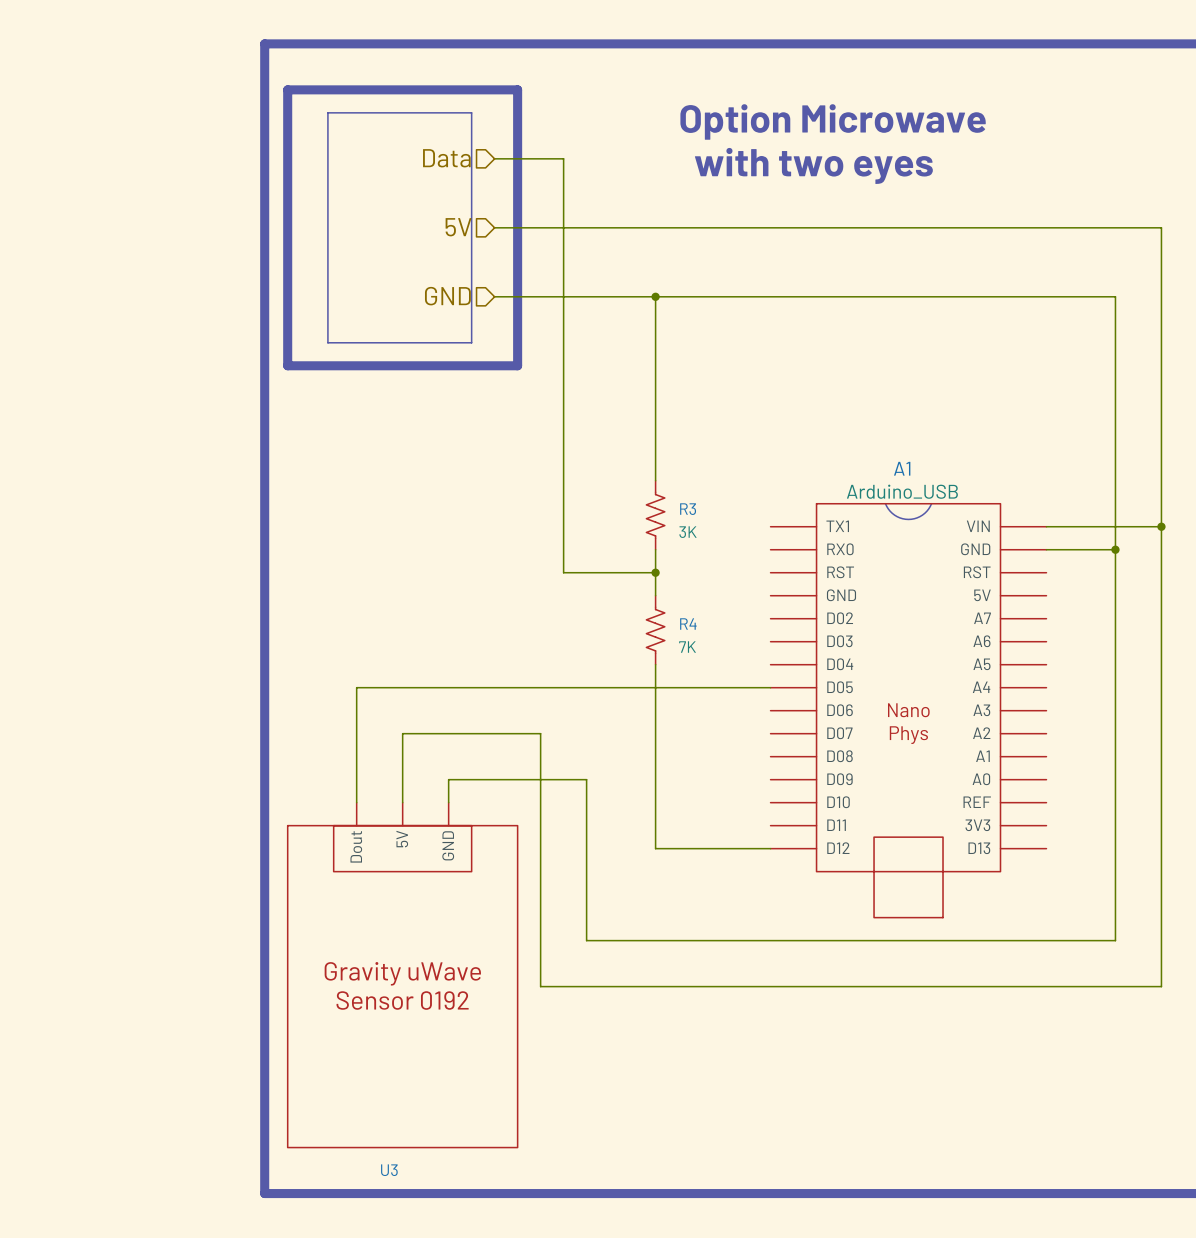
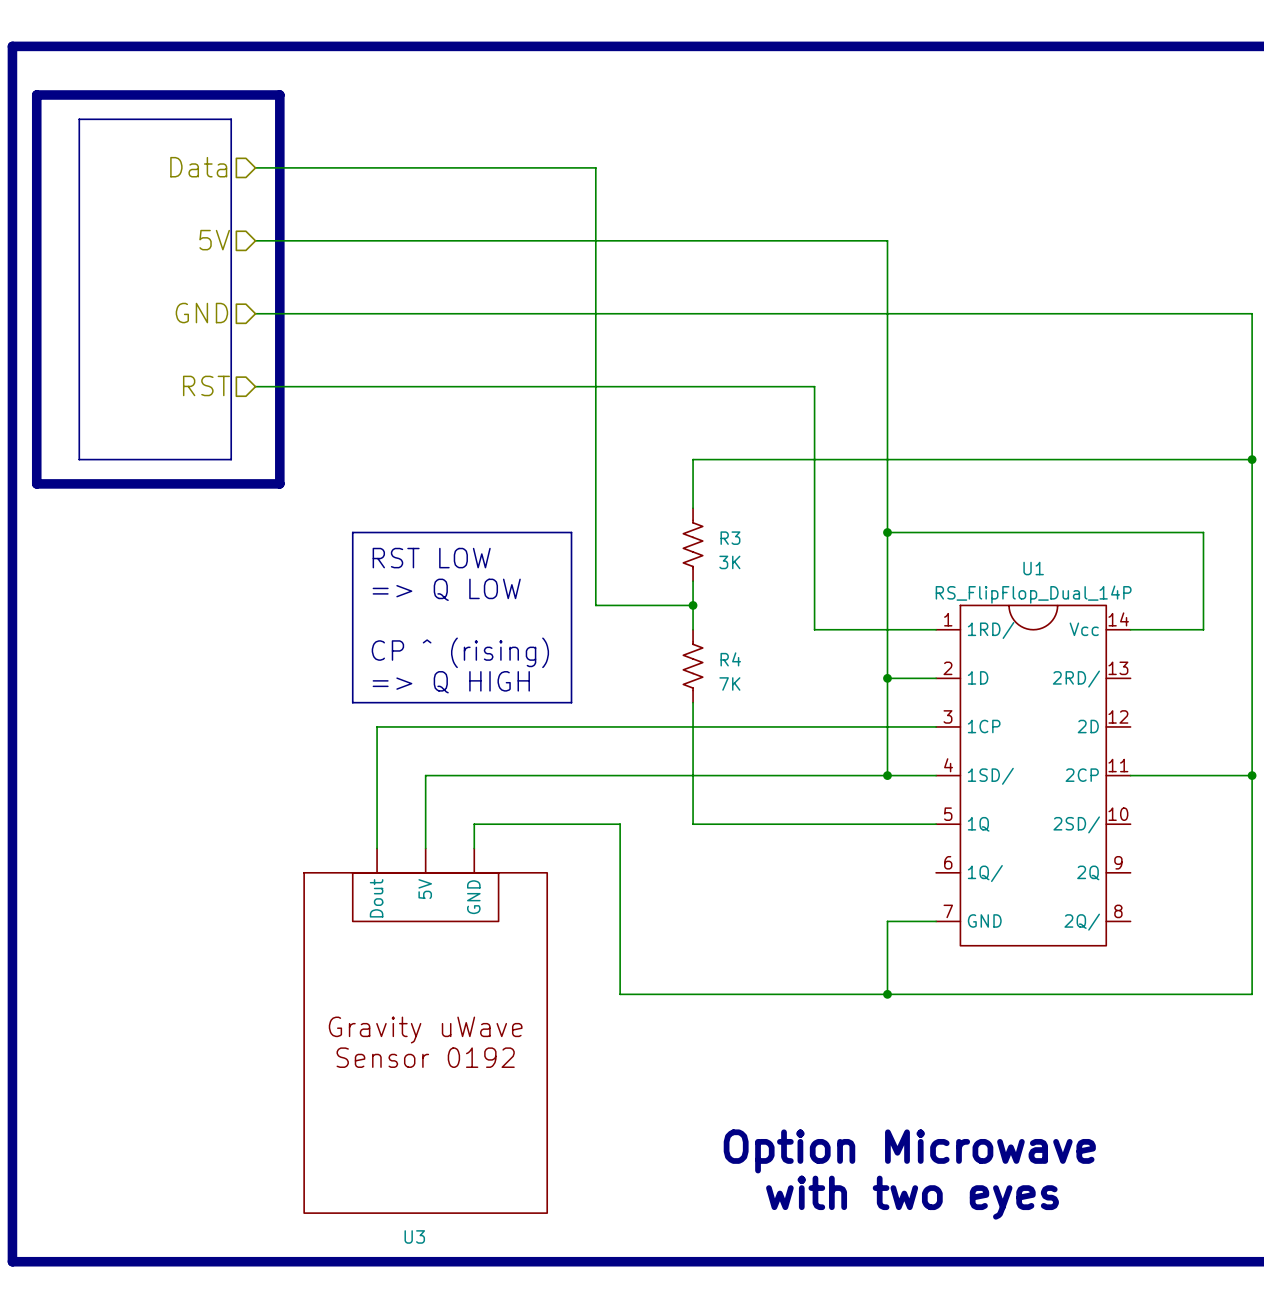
line: (264, 43) (264, 89) -> (279, 483) (36, 483) (36, 94) (279, 94)
line: (287, 89) (517, 89) (517, 365) (287, 365) (287, 89) -> none
line: none -> (79, 119) (231, 119) (231, 459) (79, 459) (79, 119)
line: (327, 112) (471, 112) (471, 342) (327, 342) (327, 112) -> none
text: Option Microwave (833, 121) -> none
hierarchical label: none -> Data (198, 167)
wire: none -> (255, 167) (522, 167)
hierarchical label: Data (446, 158) -> none
text: with two eyes (813, 165) -> none
hierarchical label: none -> 5V (214, 240)
wire: none -> (255, 240) (522, 240)
hierarchical label: 5V (458, 227) -> none
wire: (839, 227) (1161, 227) (1161, 986) (540, 986) (540, 733) -> (887, 240) (887, 775)
hierarchical label: none -> GND (201, 313)
wire: none -> (255, 313) (522, 313)
hierarchical label: GND (447, 296) -> none
wire: (655, 296) (655, 434) -> (1252, 459) (693, 459)
junction: (655, 296) -> none
wire: (1115, 296) (1115, 940) -> (1179, 313) (1252, 313) (1252, 994) (1179, 994)
hierarchical label: none -> RST (206, 385)
wire: none -> (255, 386) (814, 386) (814, 629) (936, 629)
junction: none -> (1252, 459)
line: (264, 457) (264, 1193) -> (279, 46) (12, 46) (12, 1261) (279, 1261)
line: none -> (352, 532) (571, 532) (571, 702) (352, 702) (352, 532)
wire: none -> (887, 532) (1203, 532) (1203, 629) (1130, 629)
junction: none -> (887, 532)
line: (885, 503) (894, 515) (908, 519) (922, 515) (931, 503) -> none
wire: (1046, 526) (1161, 526) -> (1130, 775) (1252, 775)
junction: (1161, 526) -> none
text: none -> RST LOW (431, 558)
wire: (1046, 549) (1115, 549) -> none
junction: (1115, 549) -> none
text: none -> => Q LOW (446, 589)
text: none -> CP ^ (rising) (460, 652)
wire: none -> (887, 678) (936, 678)
junction: none -> (887, 678)
text: none -> => Q HIGH (451, 682)
wire: none -> (814, 726) (936, 726)
A1: Arduino_USB (908, 710) -> none
wire: none -> (571, 775) (936, 775)
junction: none -> (887, 775)
U1: none -> RS_FlipFlop_Dual_14P (1033, 775)
junction: none -> (1252, 775)
wire: (655, 779) (655, 848) (770, 848) -> (693, 824) (936, 824)
wire: none -> (936, 921) (887, 921) (887, 994)
junction: none -> (887, 994)
text: none -> Option Microwave (909, 1151)
text: none -> with two eyes (912, 1197)

